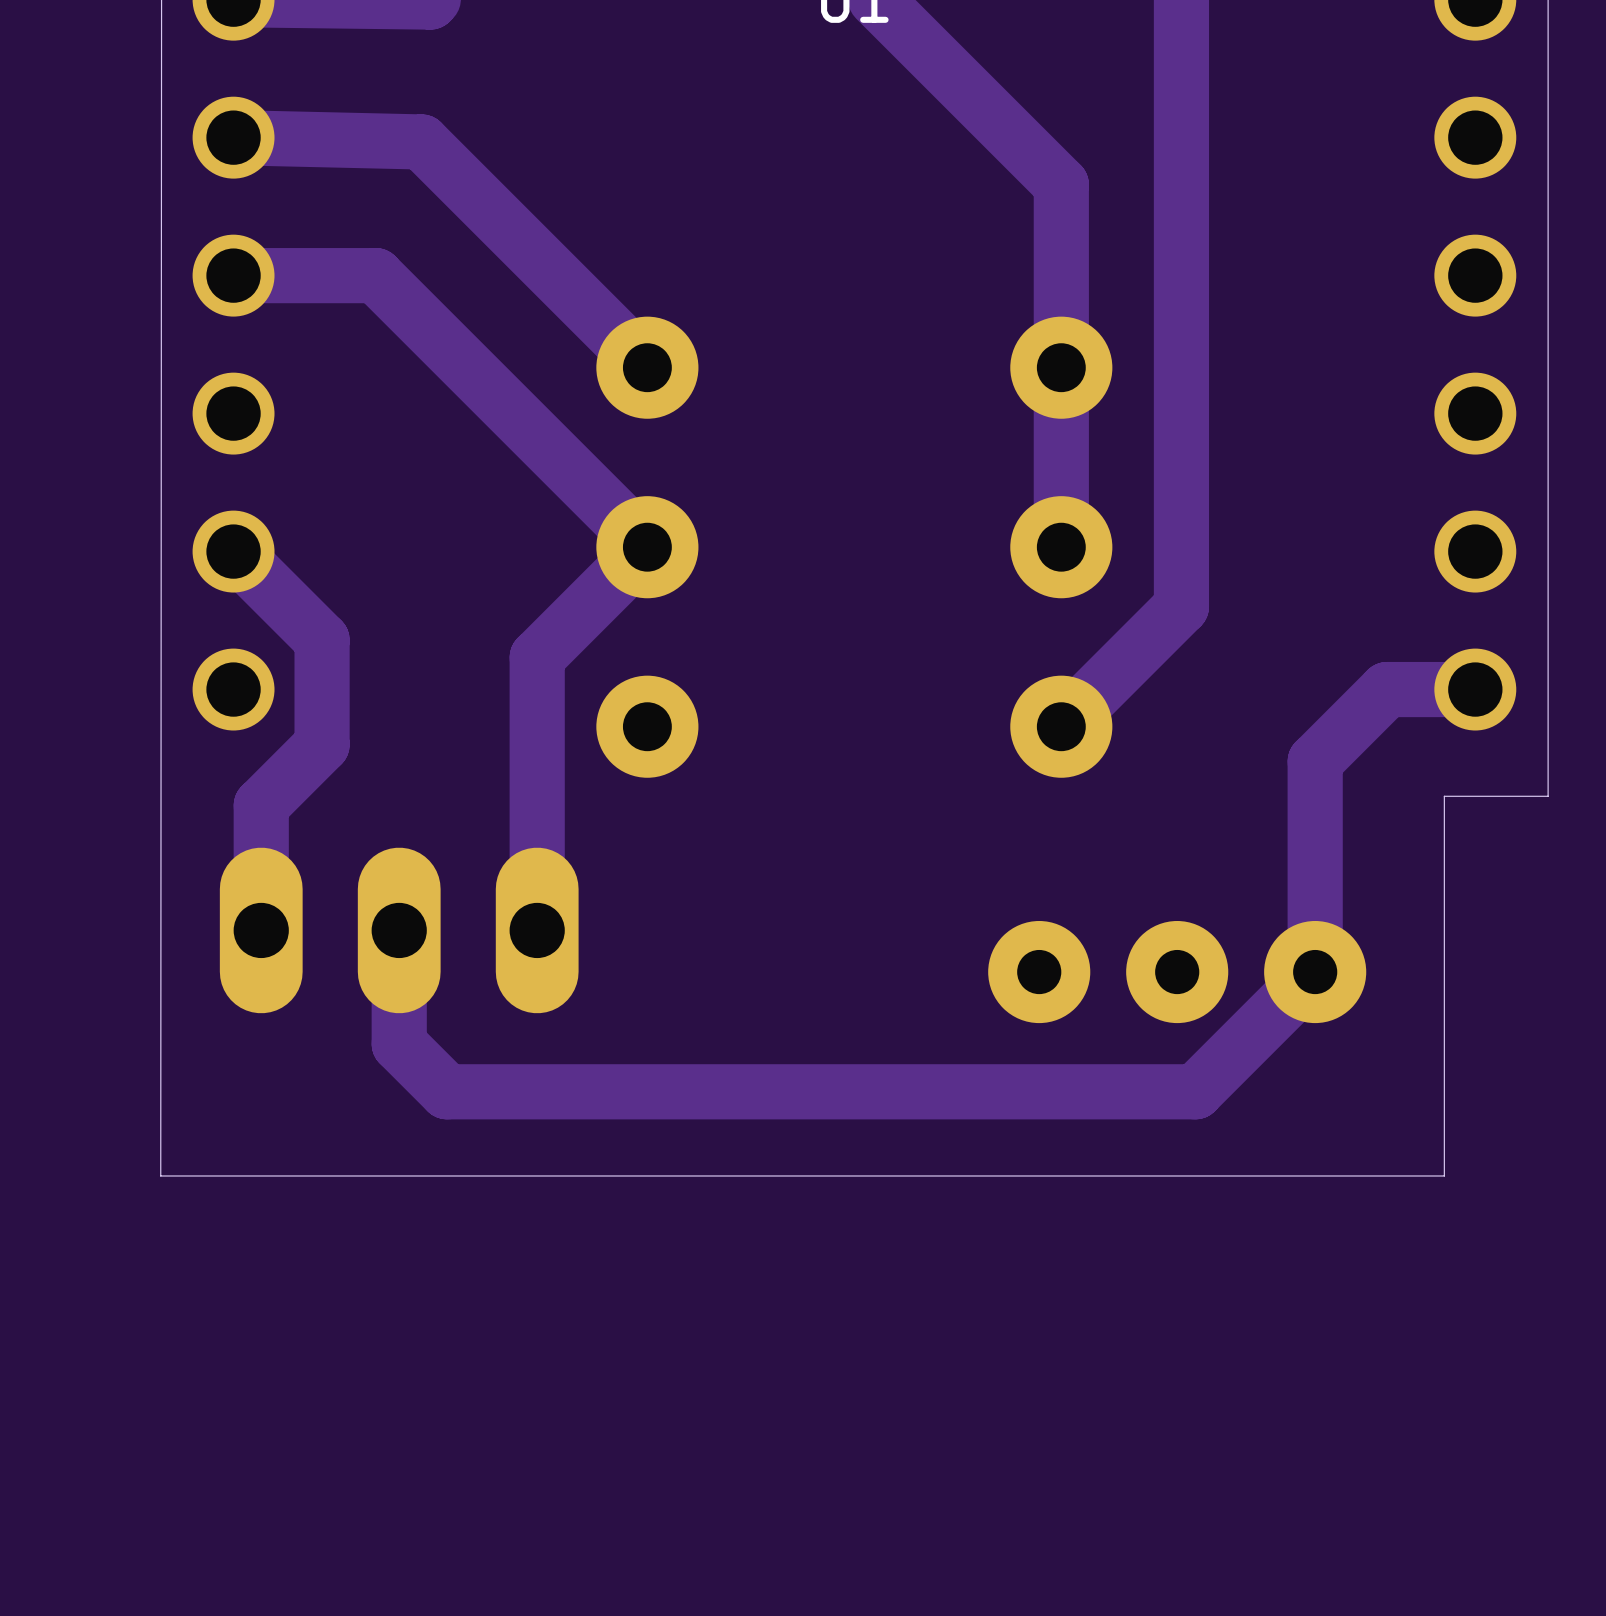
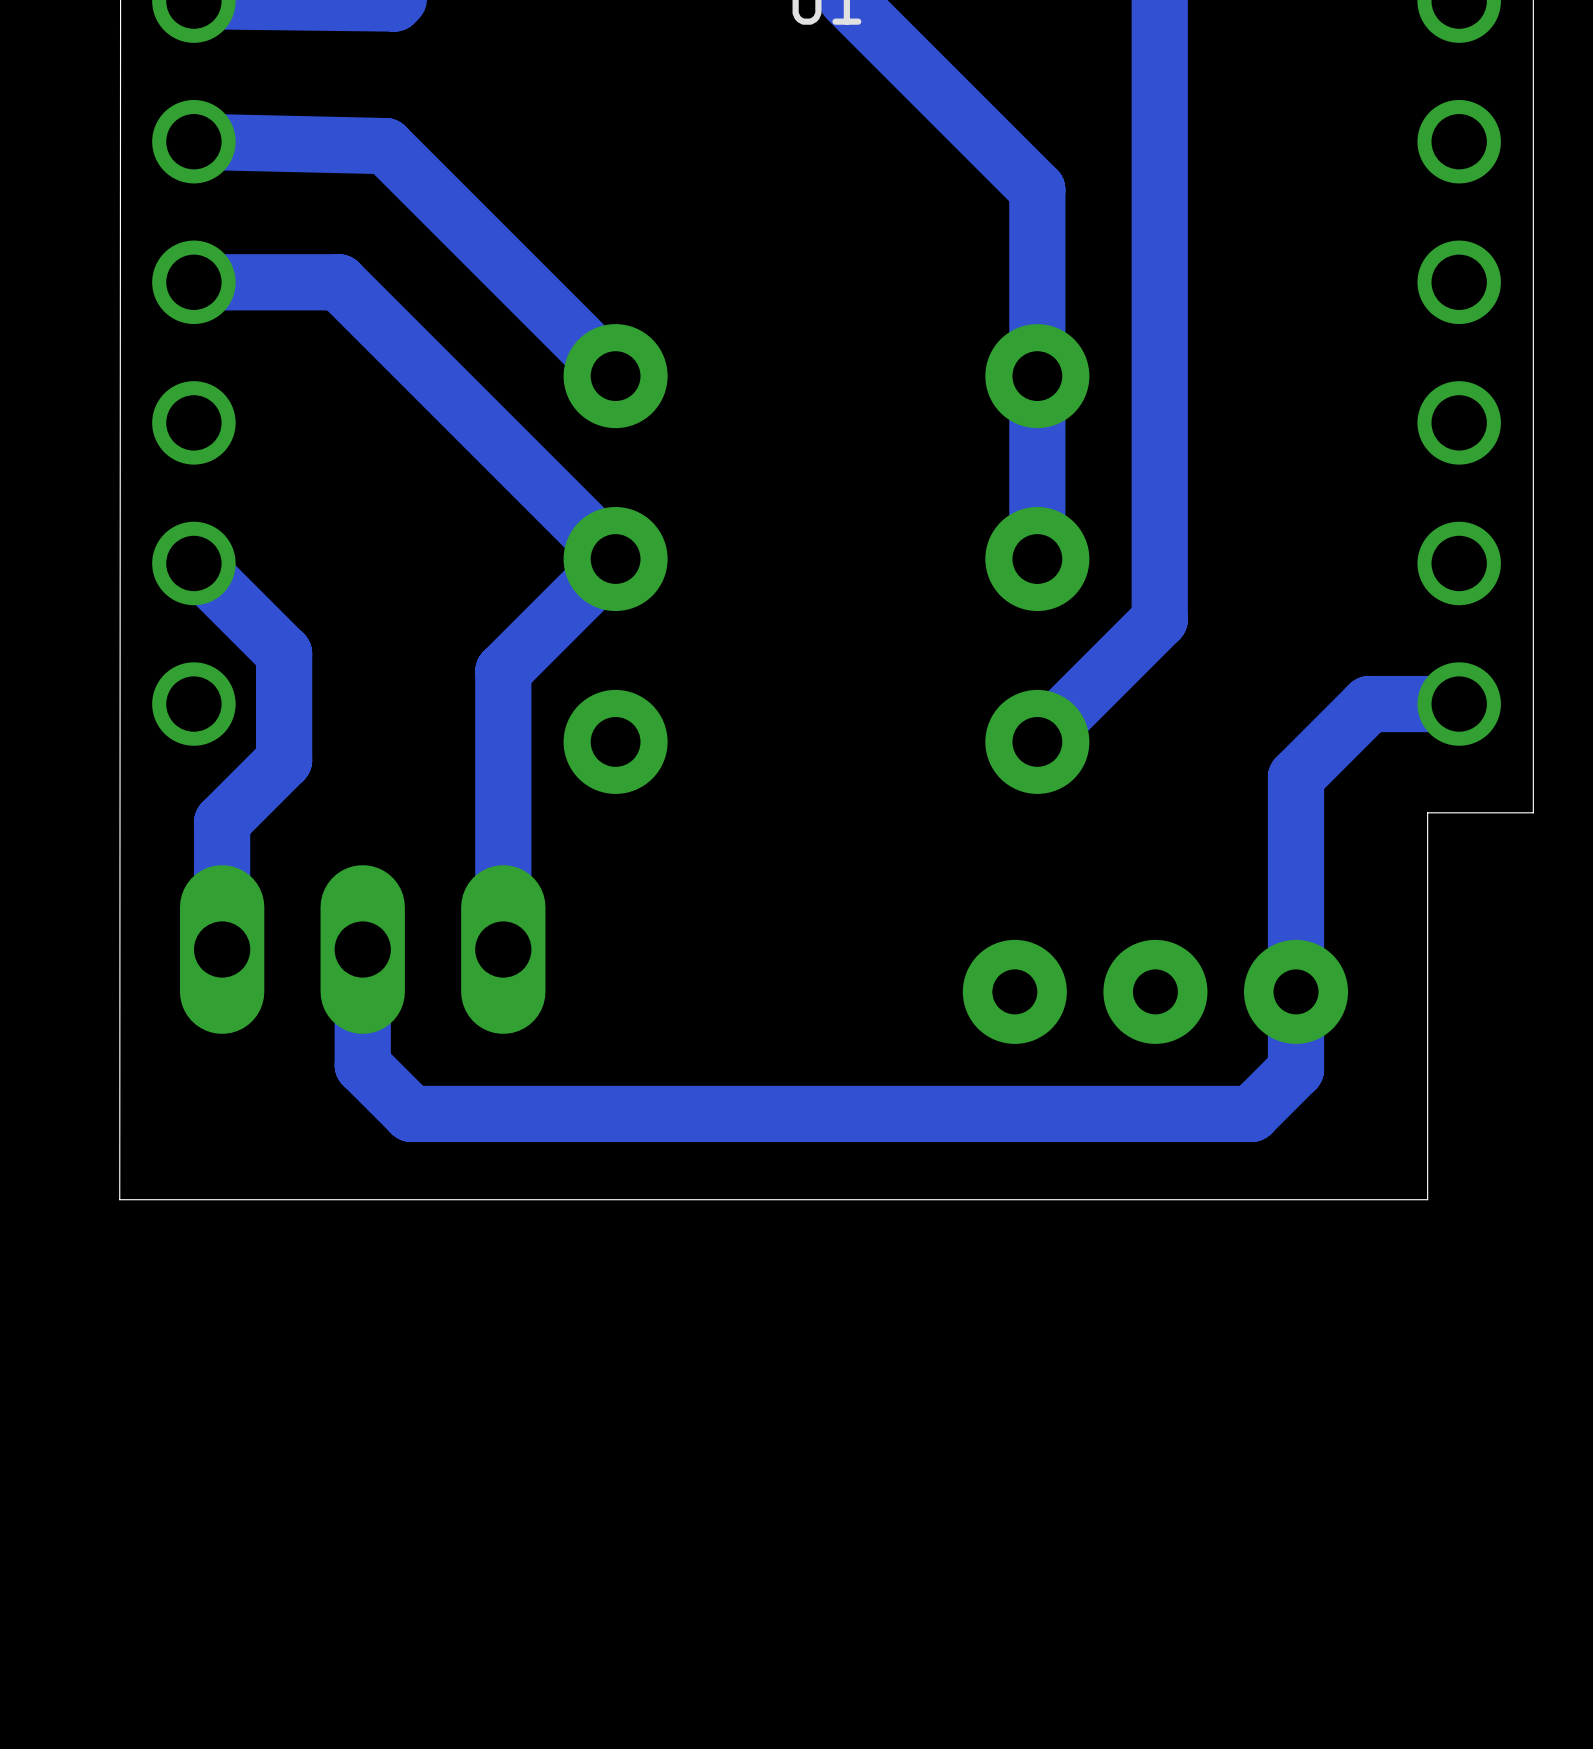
track: (1315, 972) (1195, 1091) -> (1296, 991) (1296, 1069) (1251, 1113) (1173, 1113)

